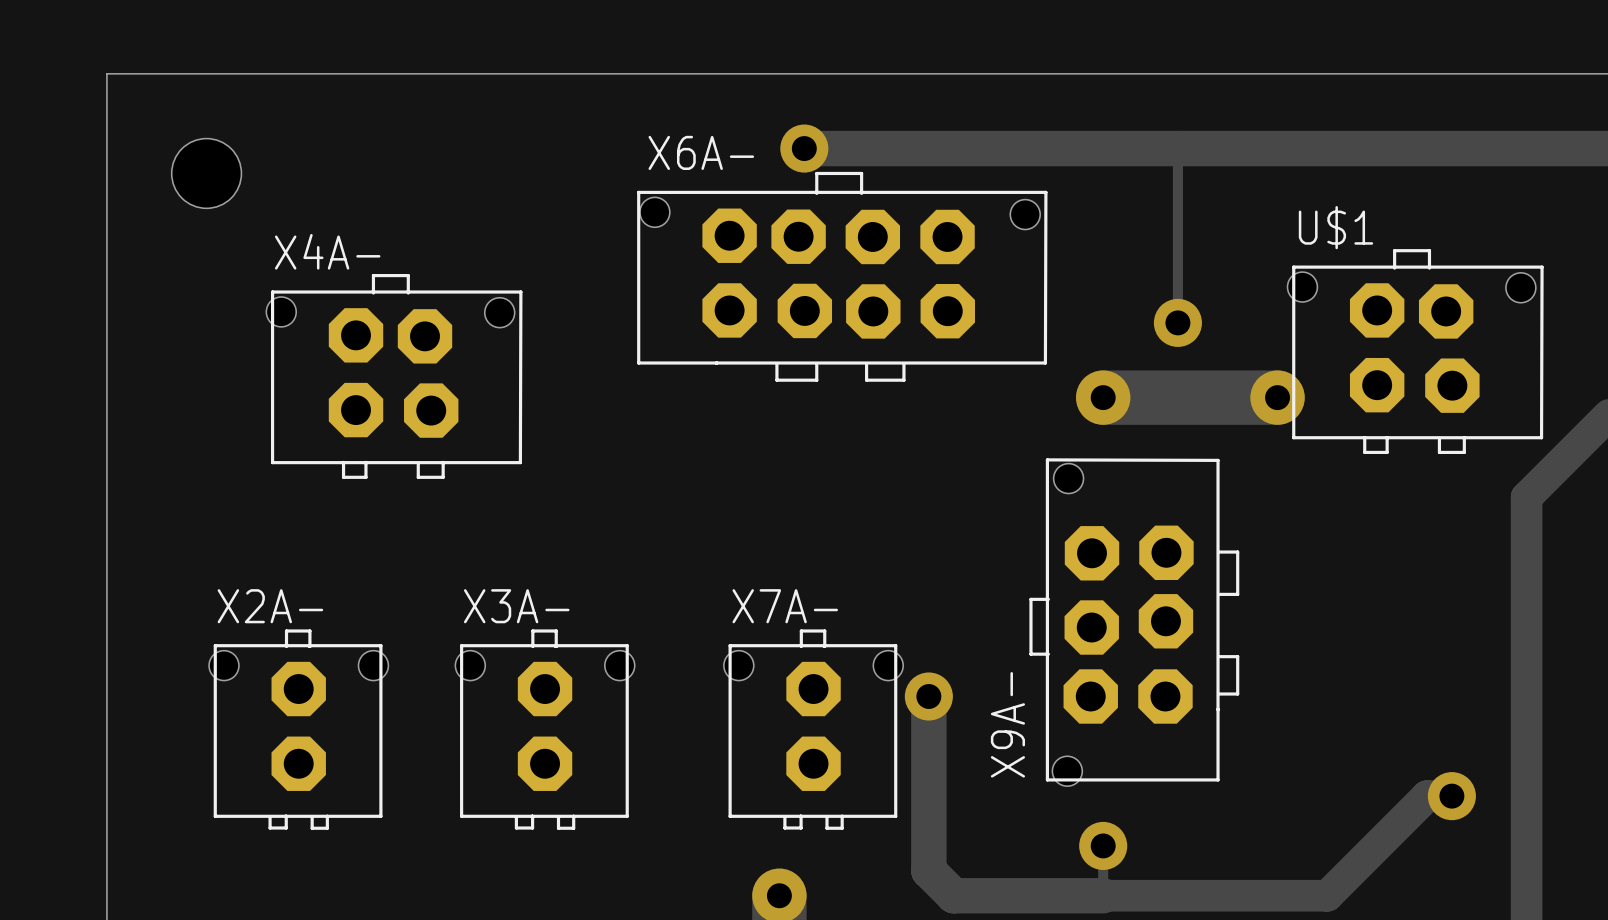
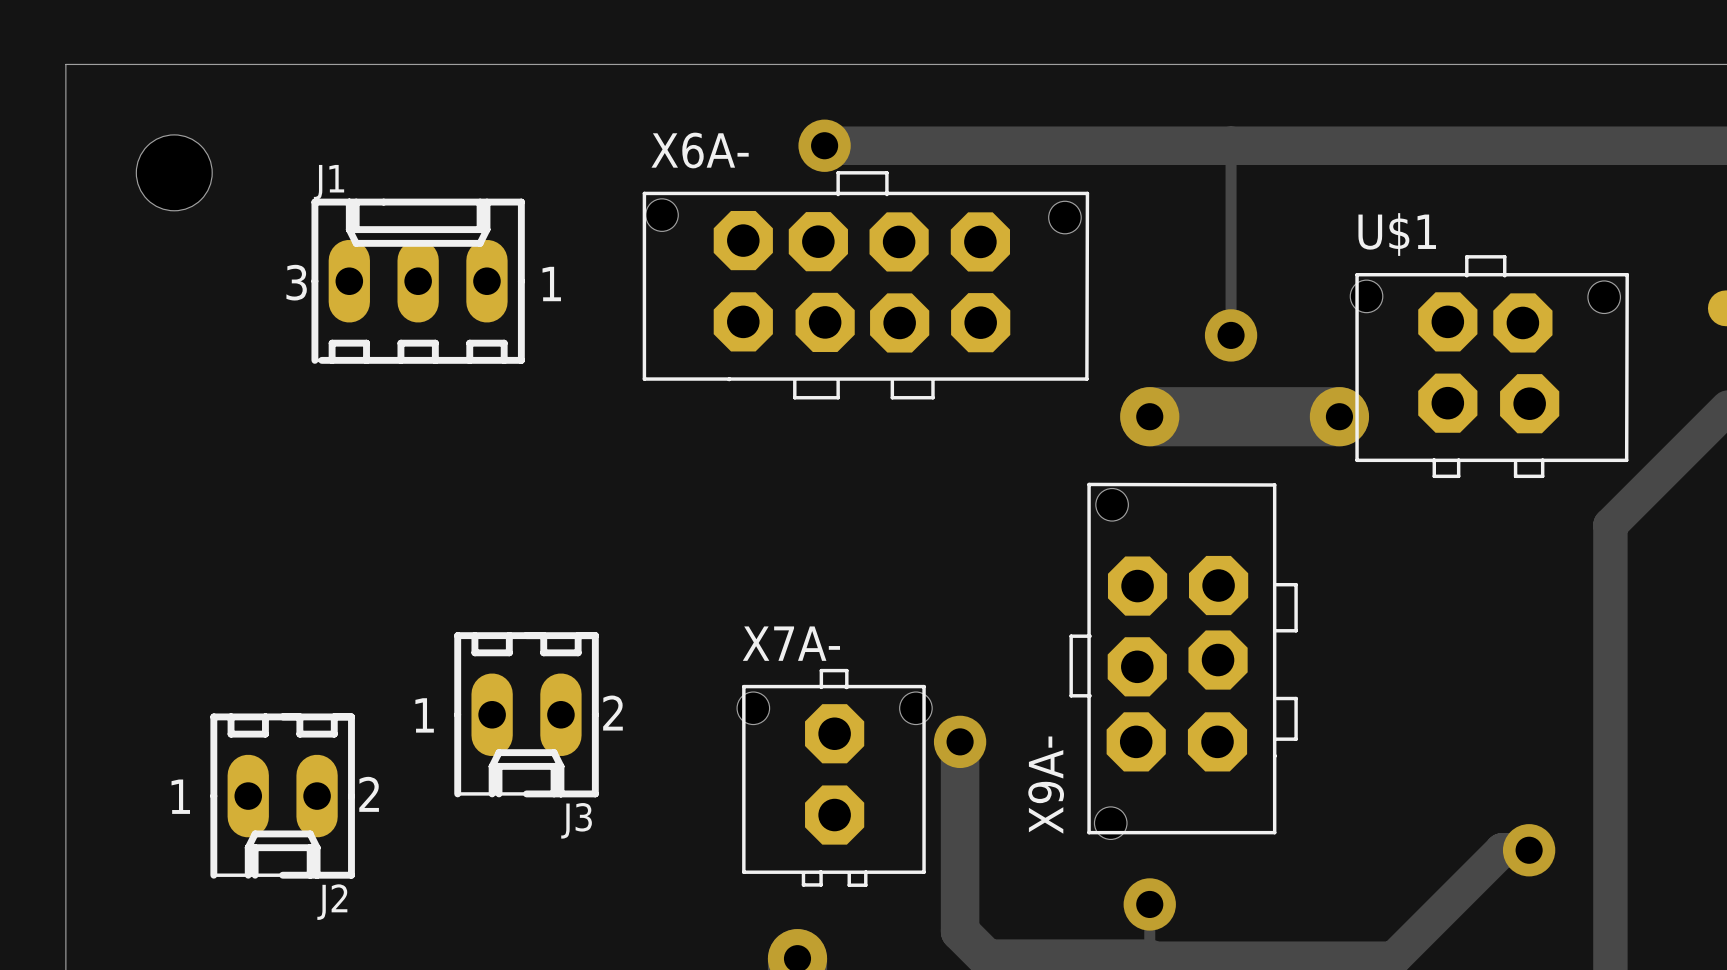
J1: none -> (418, 281)
X4A-: (394, 376) -> none
J3: none -> (526, 714)
X2A-: (298, 729) -> none
X3A-: (545, 729) -> none
J2: none -> (282, 796)

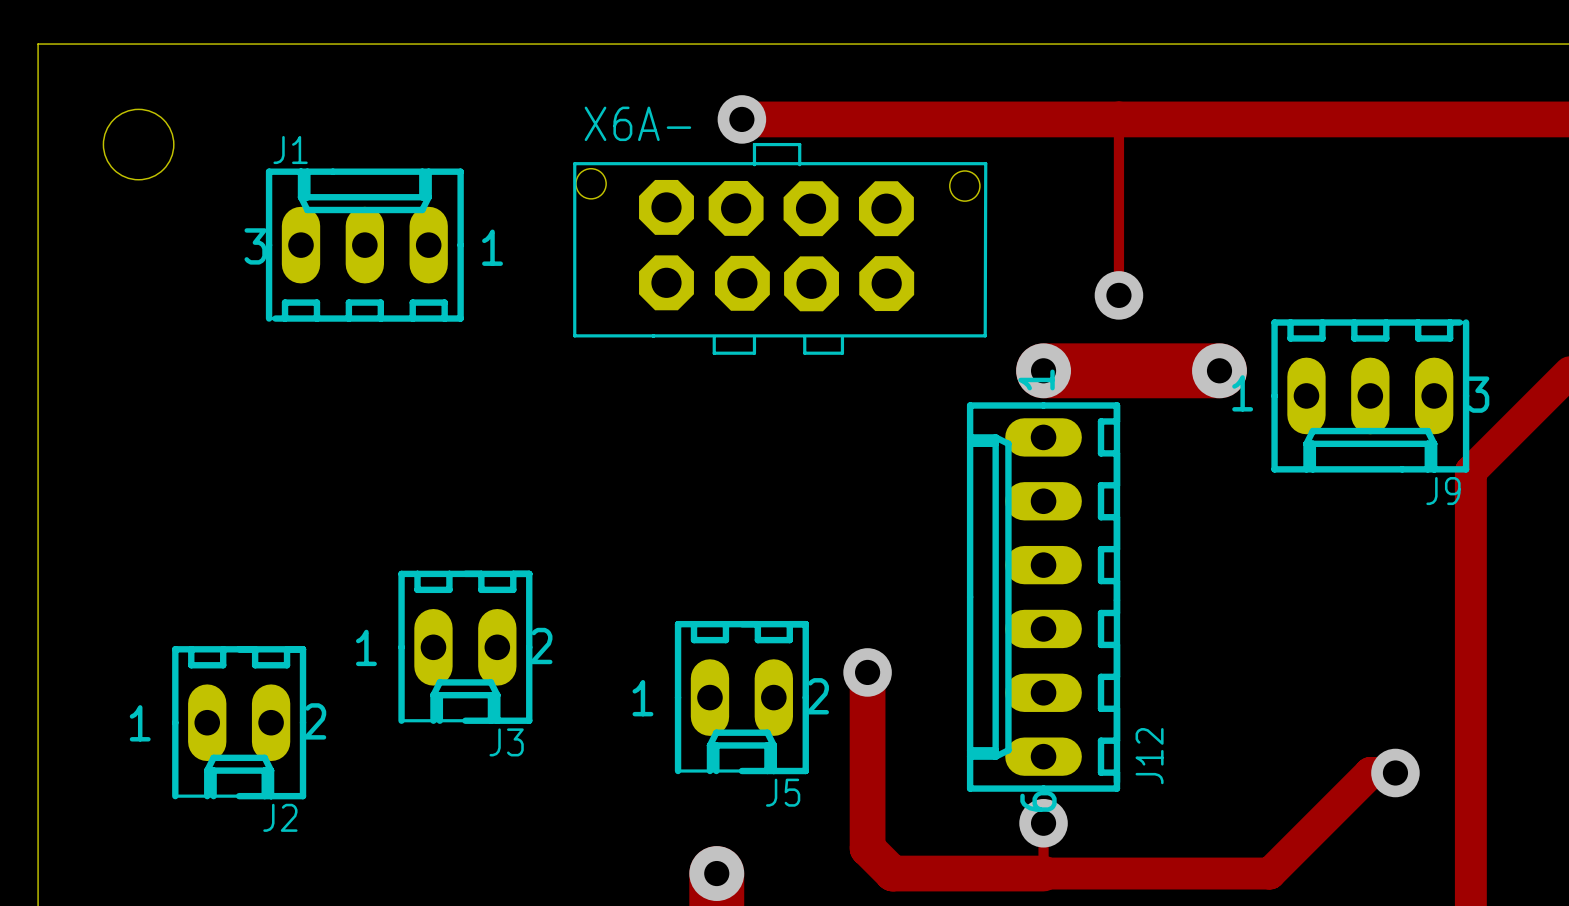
U$1: (1489, 366) -> none
J9: none -> (1370, 395)
J12: none -> (1043, 597)
X9A-: (1183, 661) -> none
J5: none -> (741, 697)
X7A-: (834, 777) -> none

